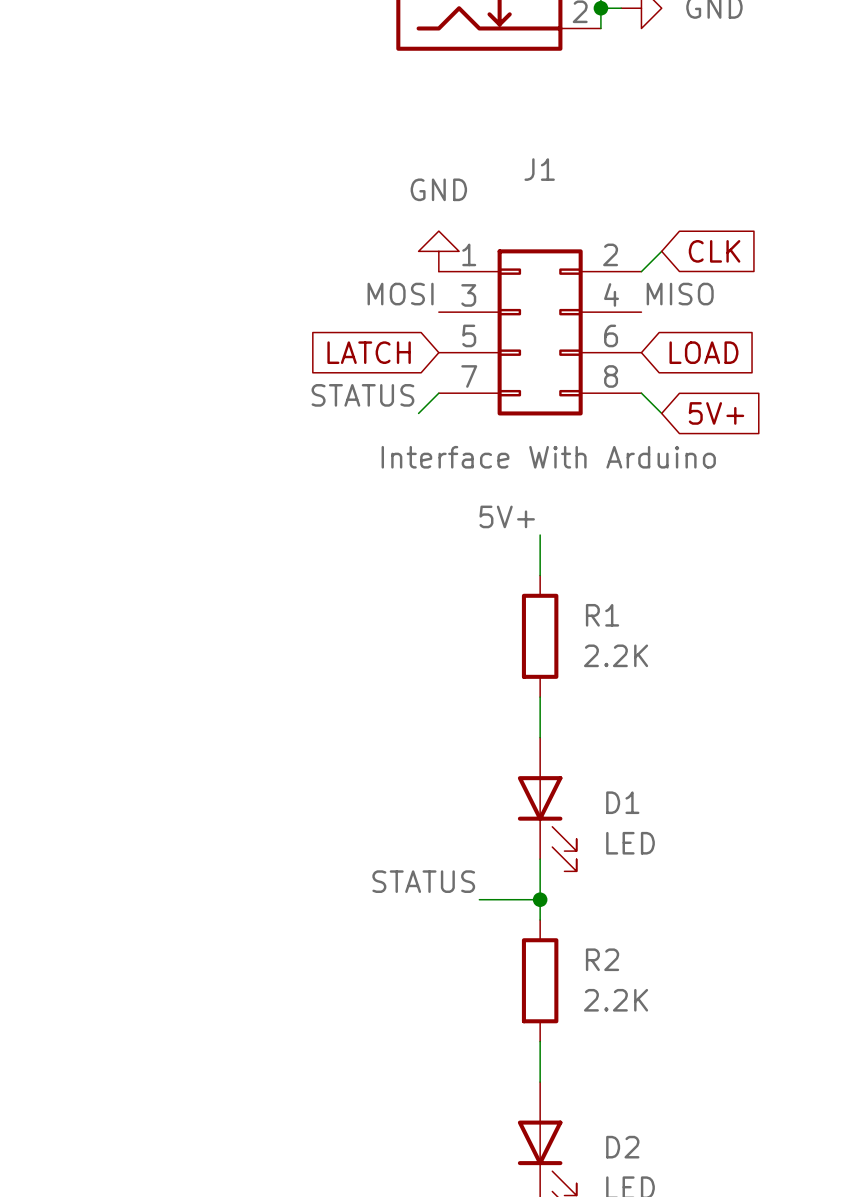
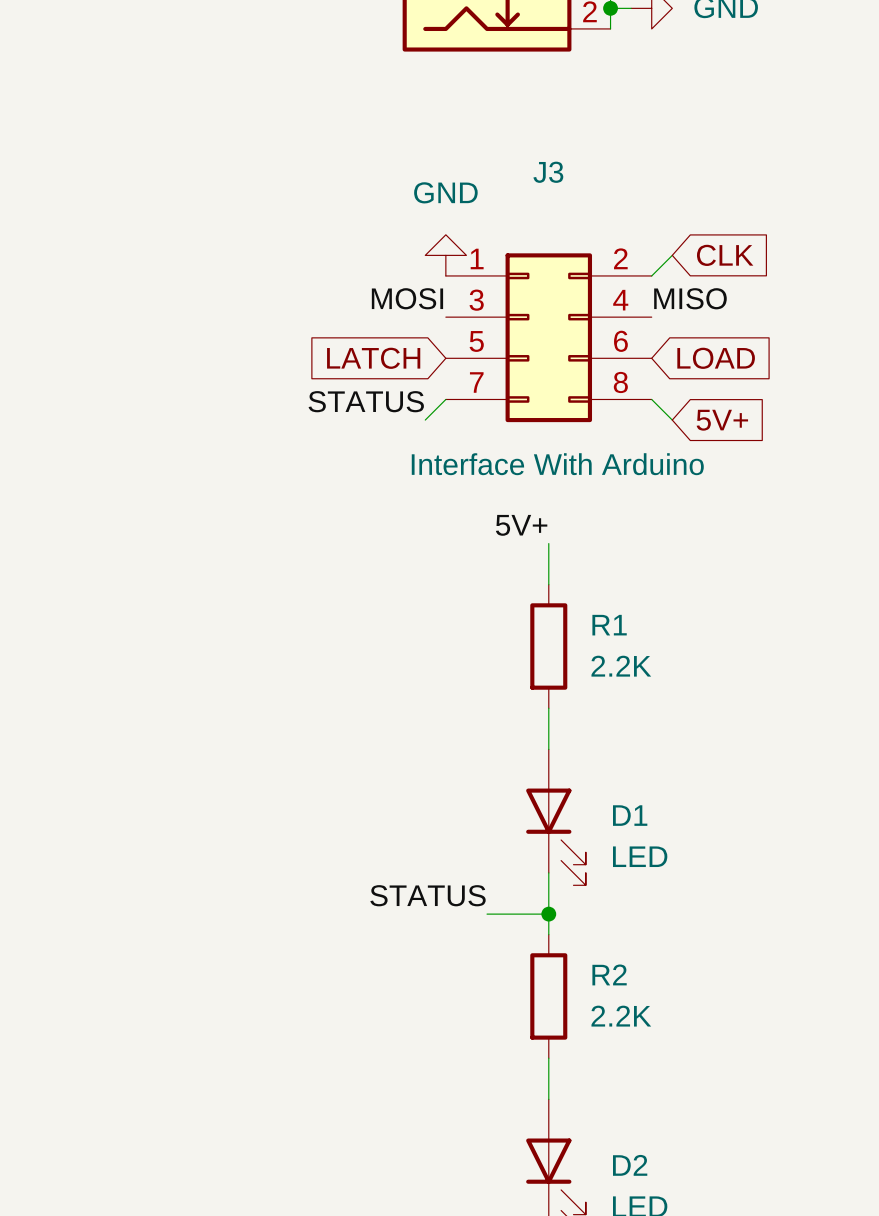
J1 name: J1 (539, 169) -> J3 (548, 172)

